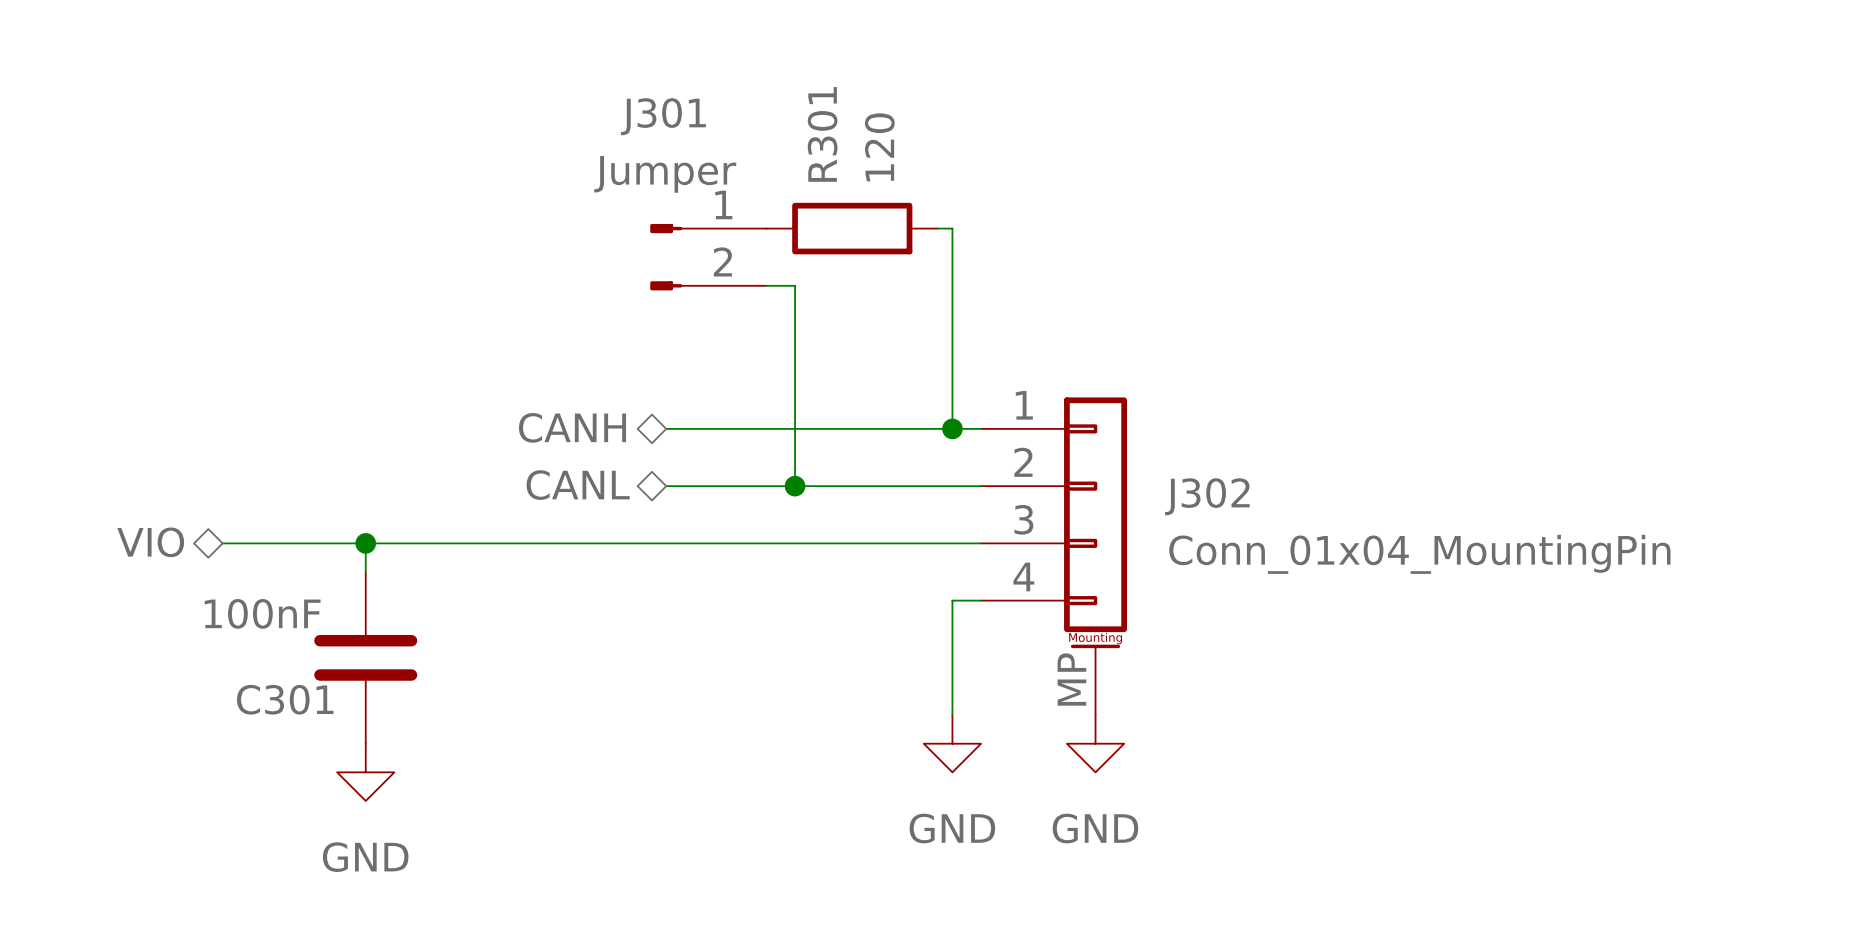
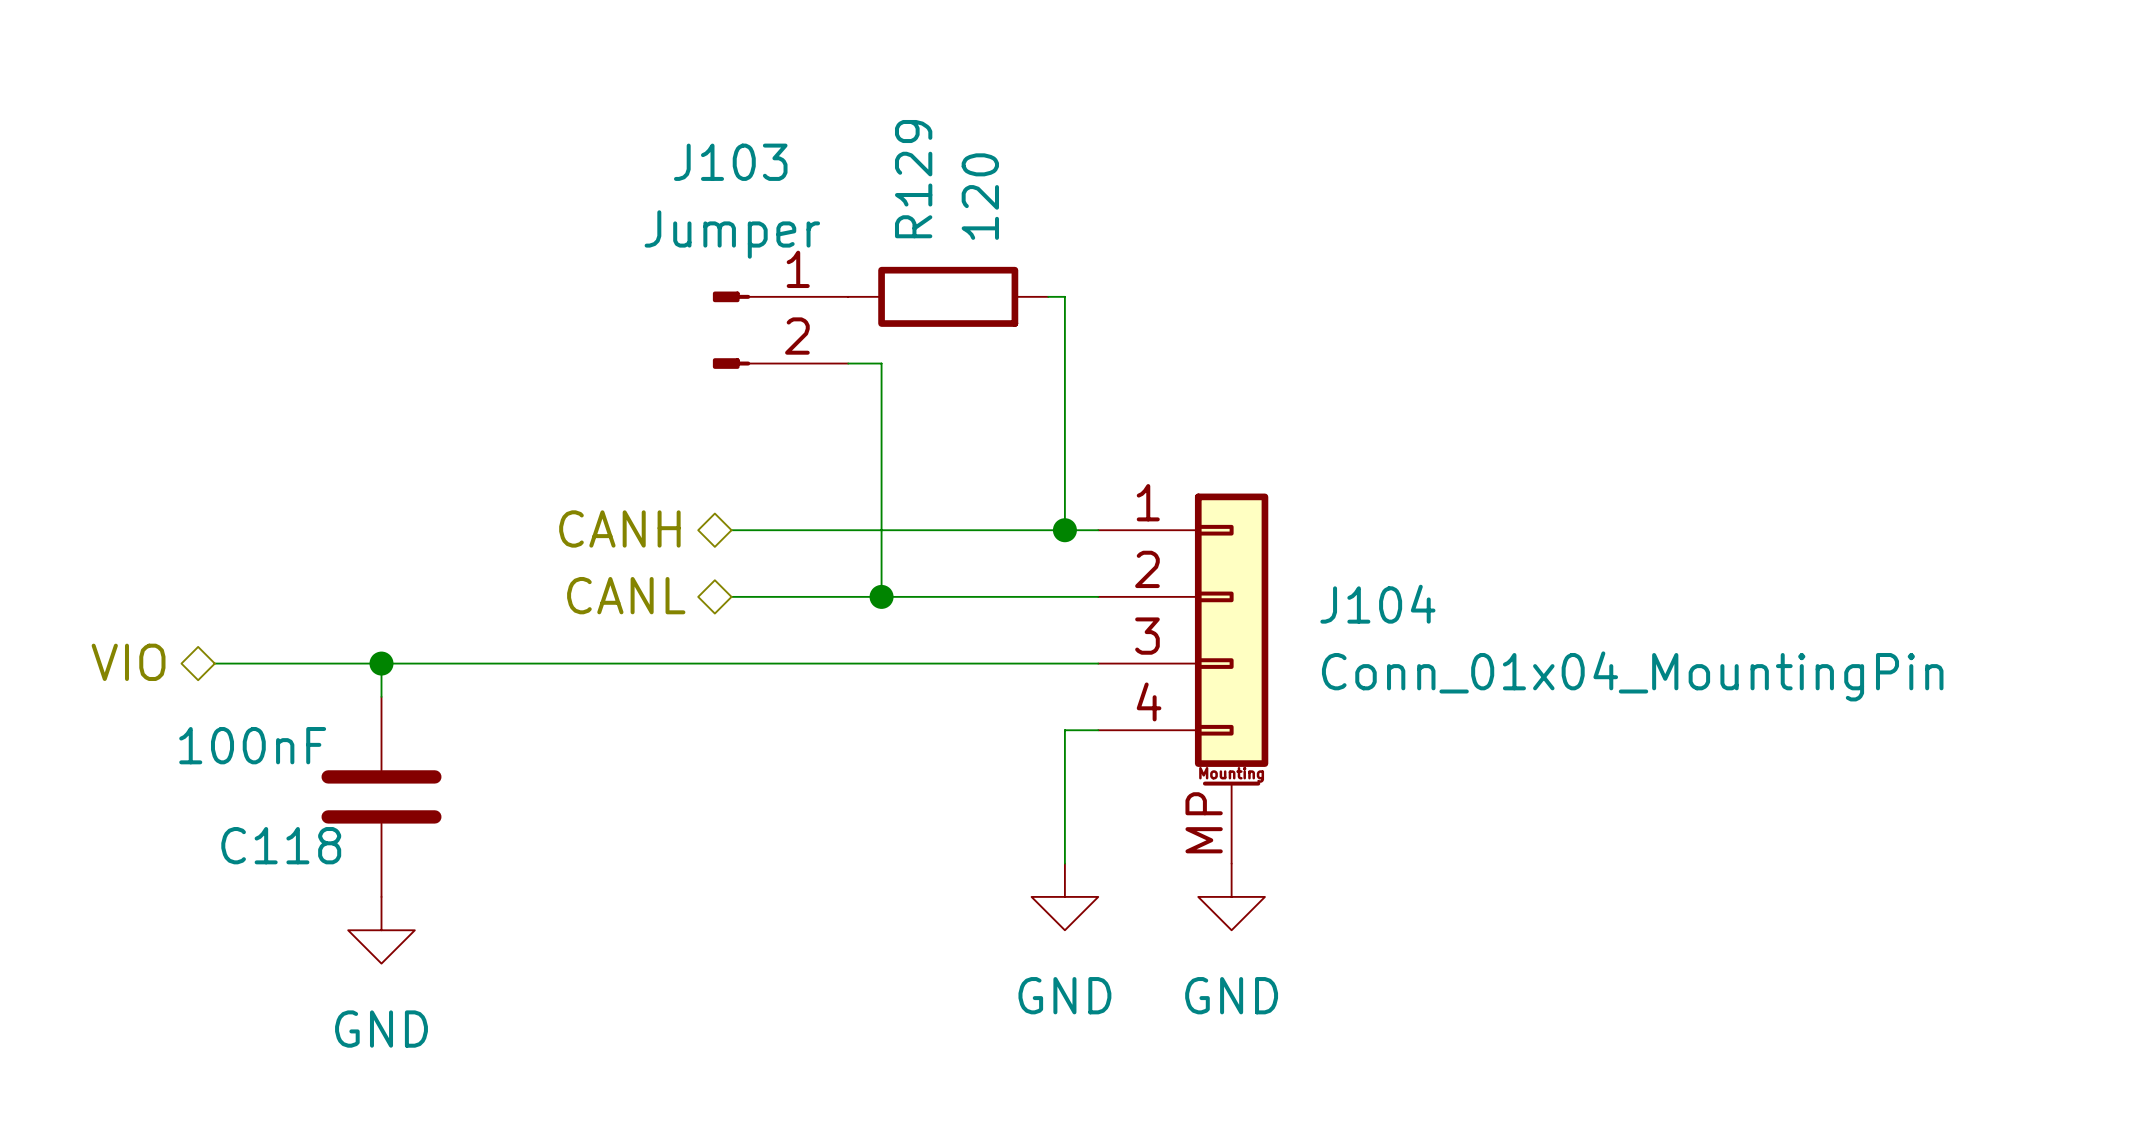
J301 name: J301 (663, 116) -> J103 (730, 162)
R301 name: R301 (822, 134) -> R129 (913, 179)
J302 name: J302 (1207, 496) -> J104 (1377, 604)
C301 name: C301 (285, 699) -> C118 (281, 845)

